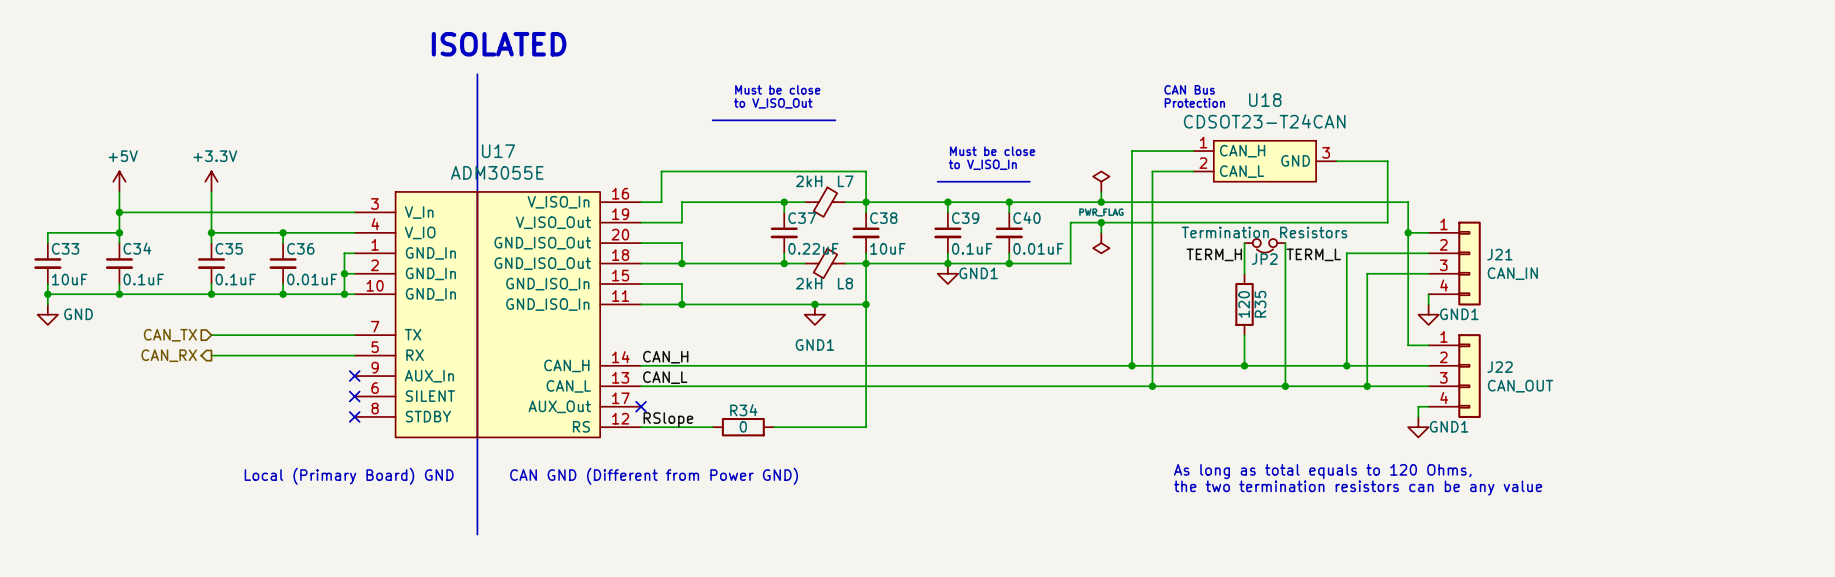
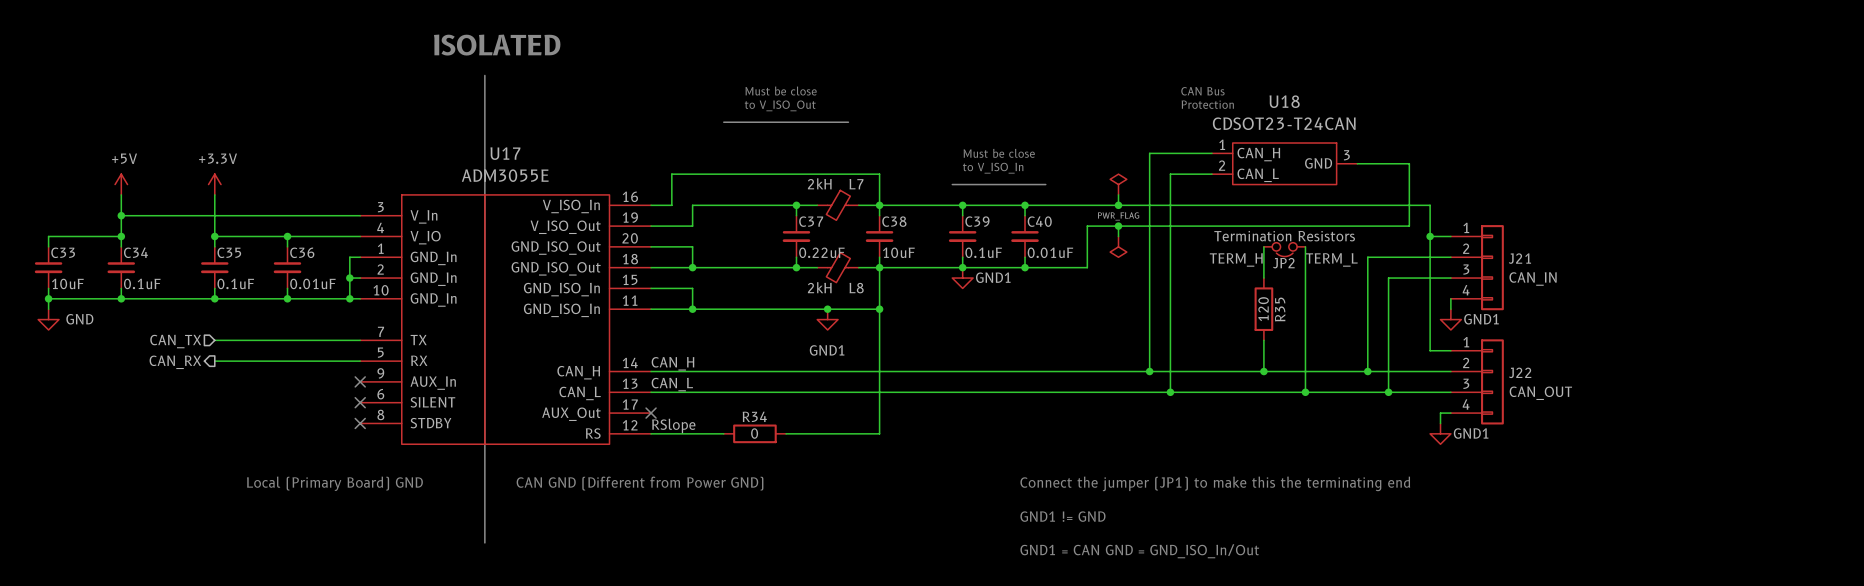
text: As long as total equals to 120 Ohms, (1322, 471) -> none
text: none -> Connect the jumper (JP1) to make this the terminating end (1215, 483)
text: the two termination resistors can be any value (1358, 488) -> none
text: none -> GND1 != GND (1062, 516)
text: none -> GND1 = CAN GND = GND_ISO_In/Out (1139, 551)

